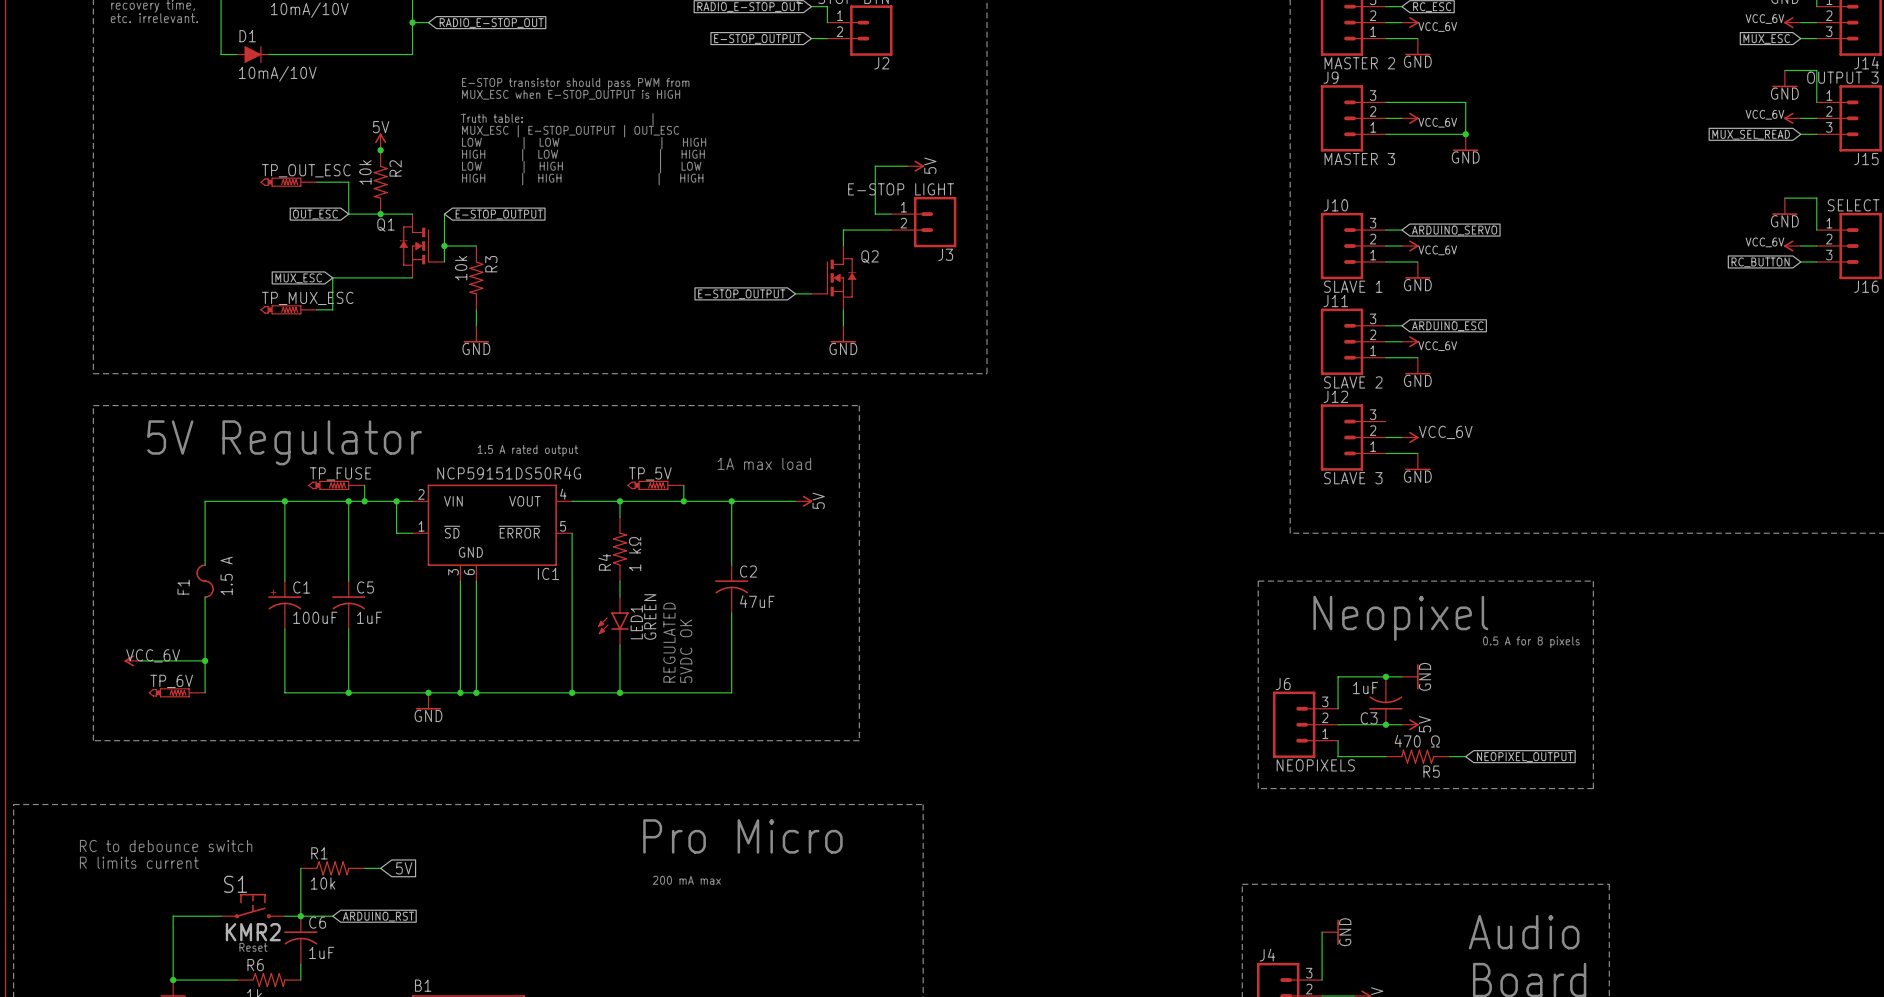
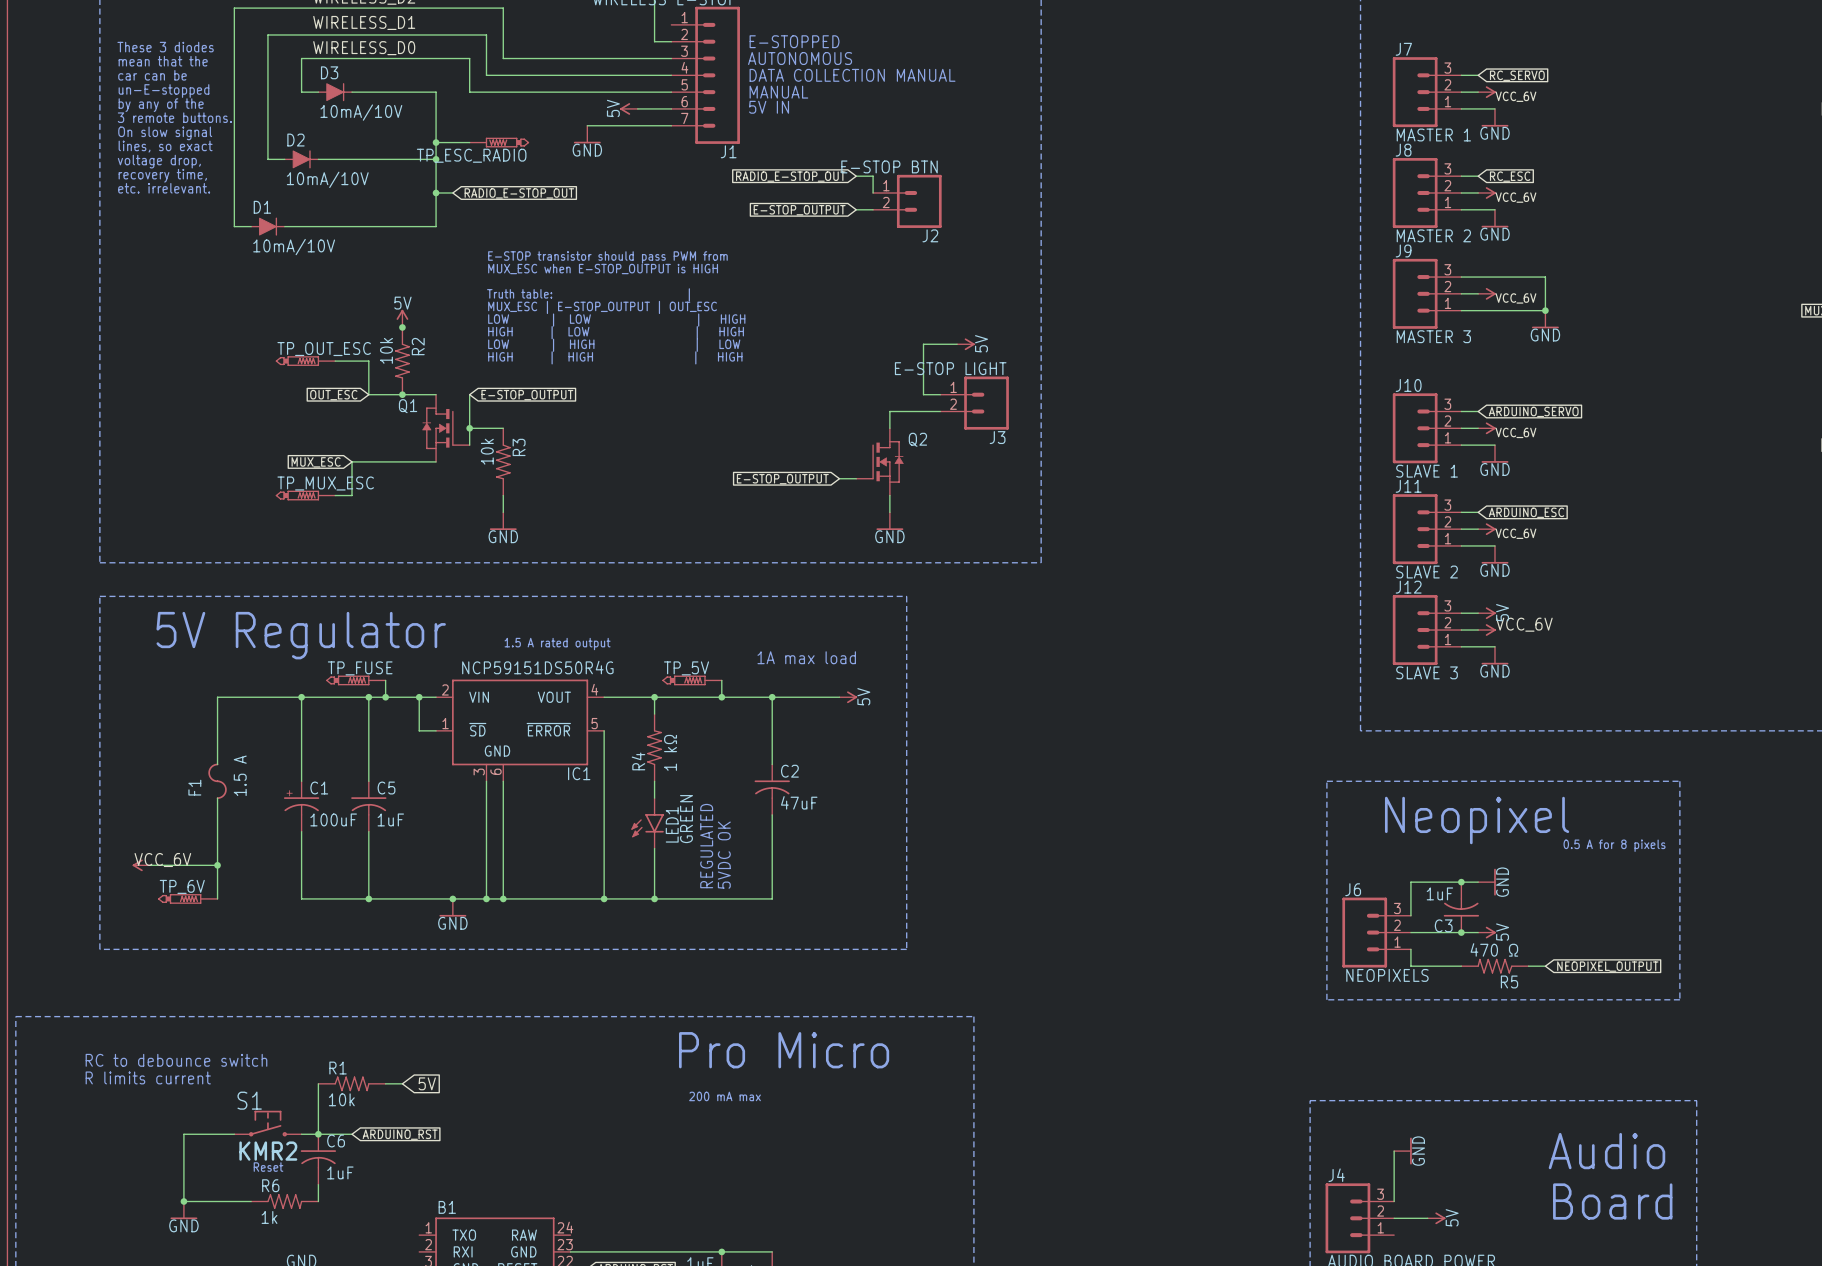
wire: none -> (1461, 613) (1478, 613)
power symbol: none -> 5V (1487, 613)

